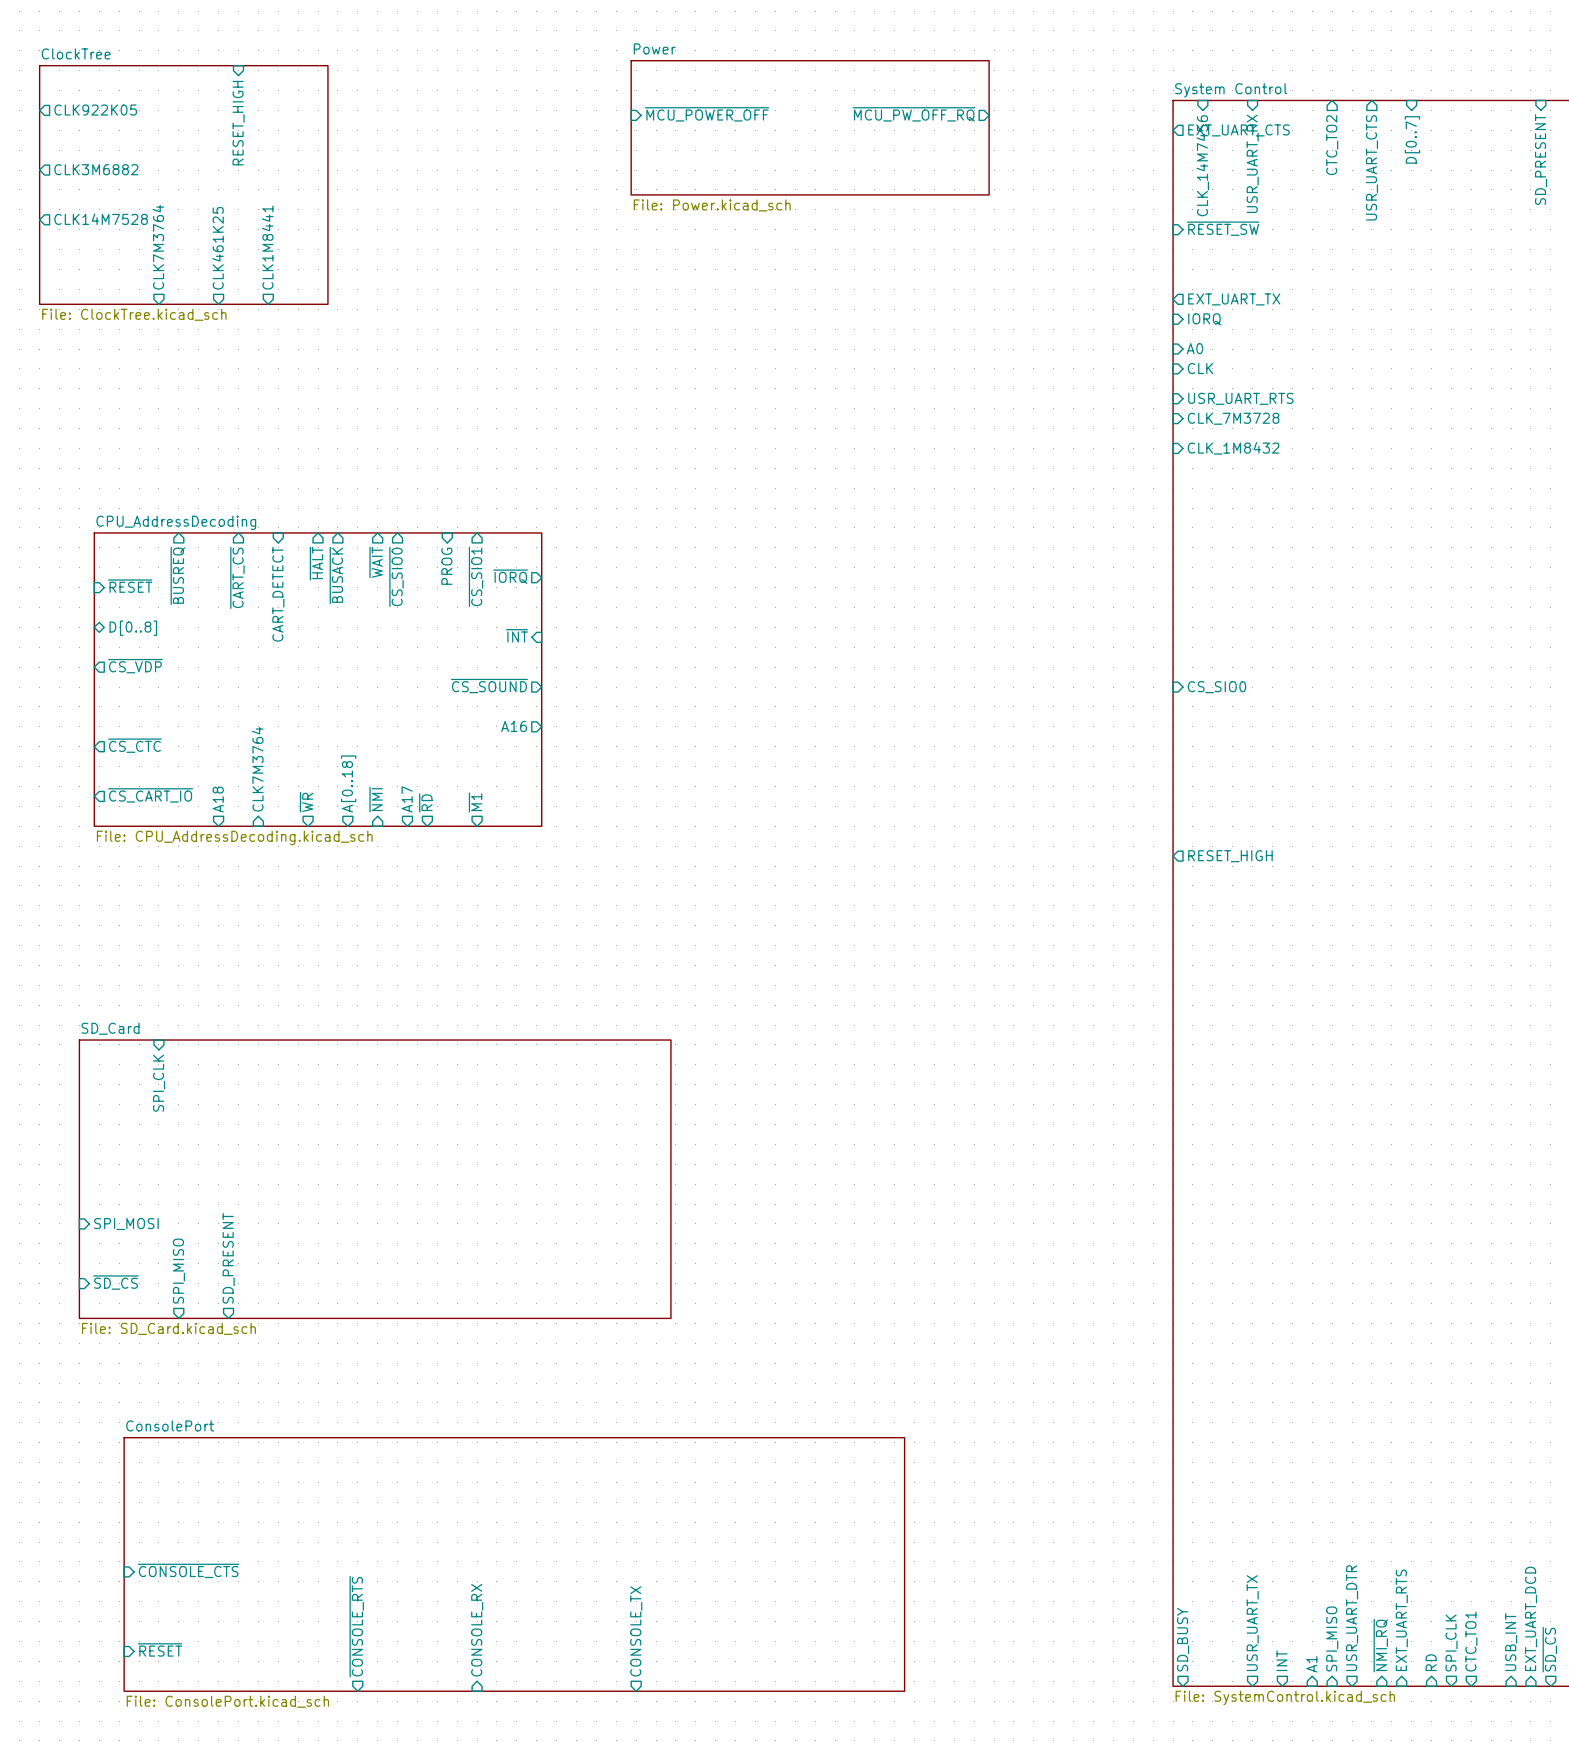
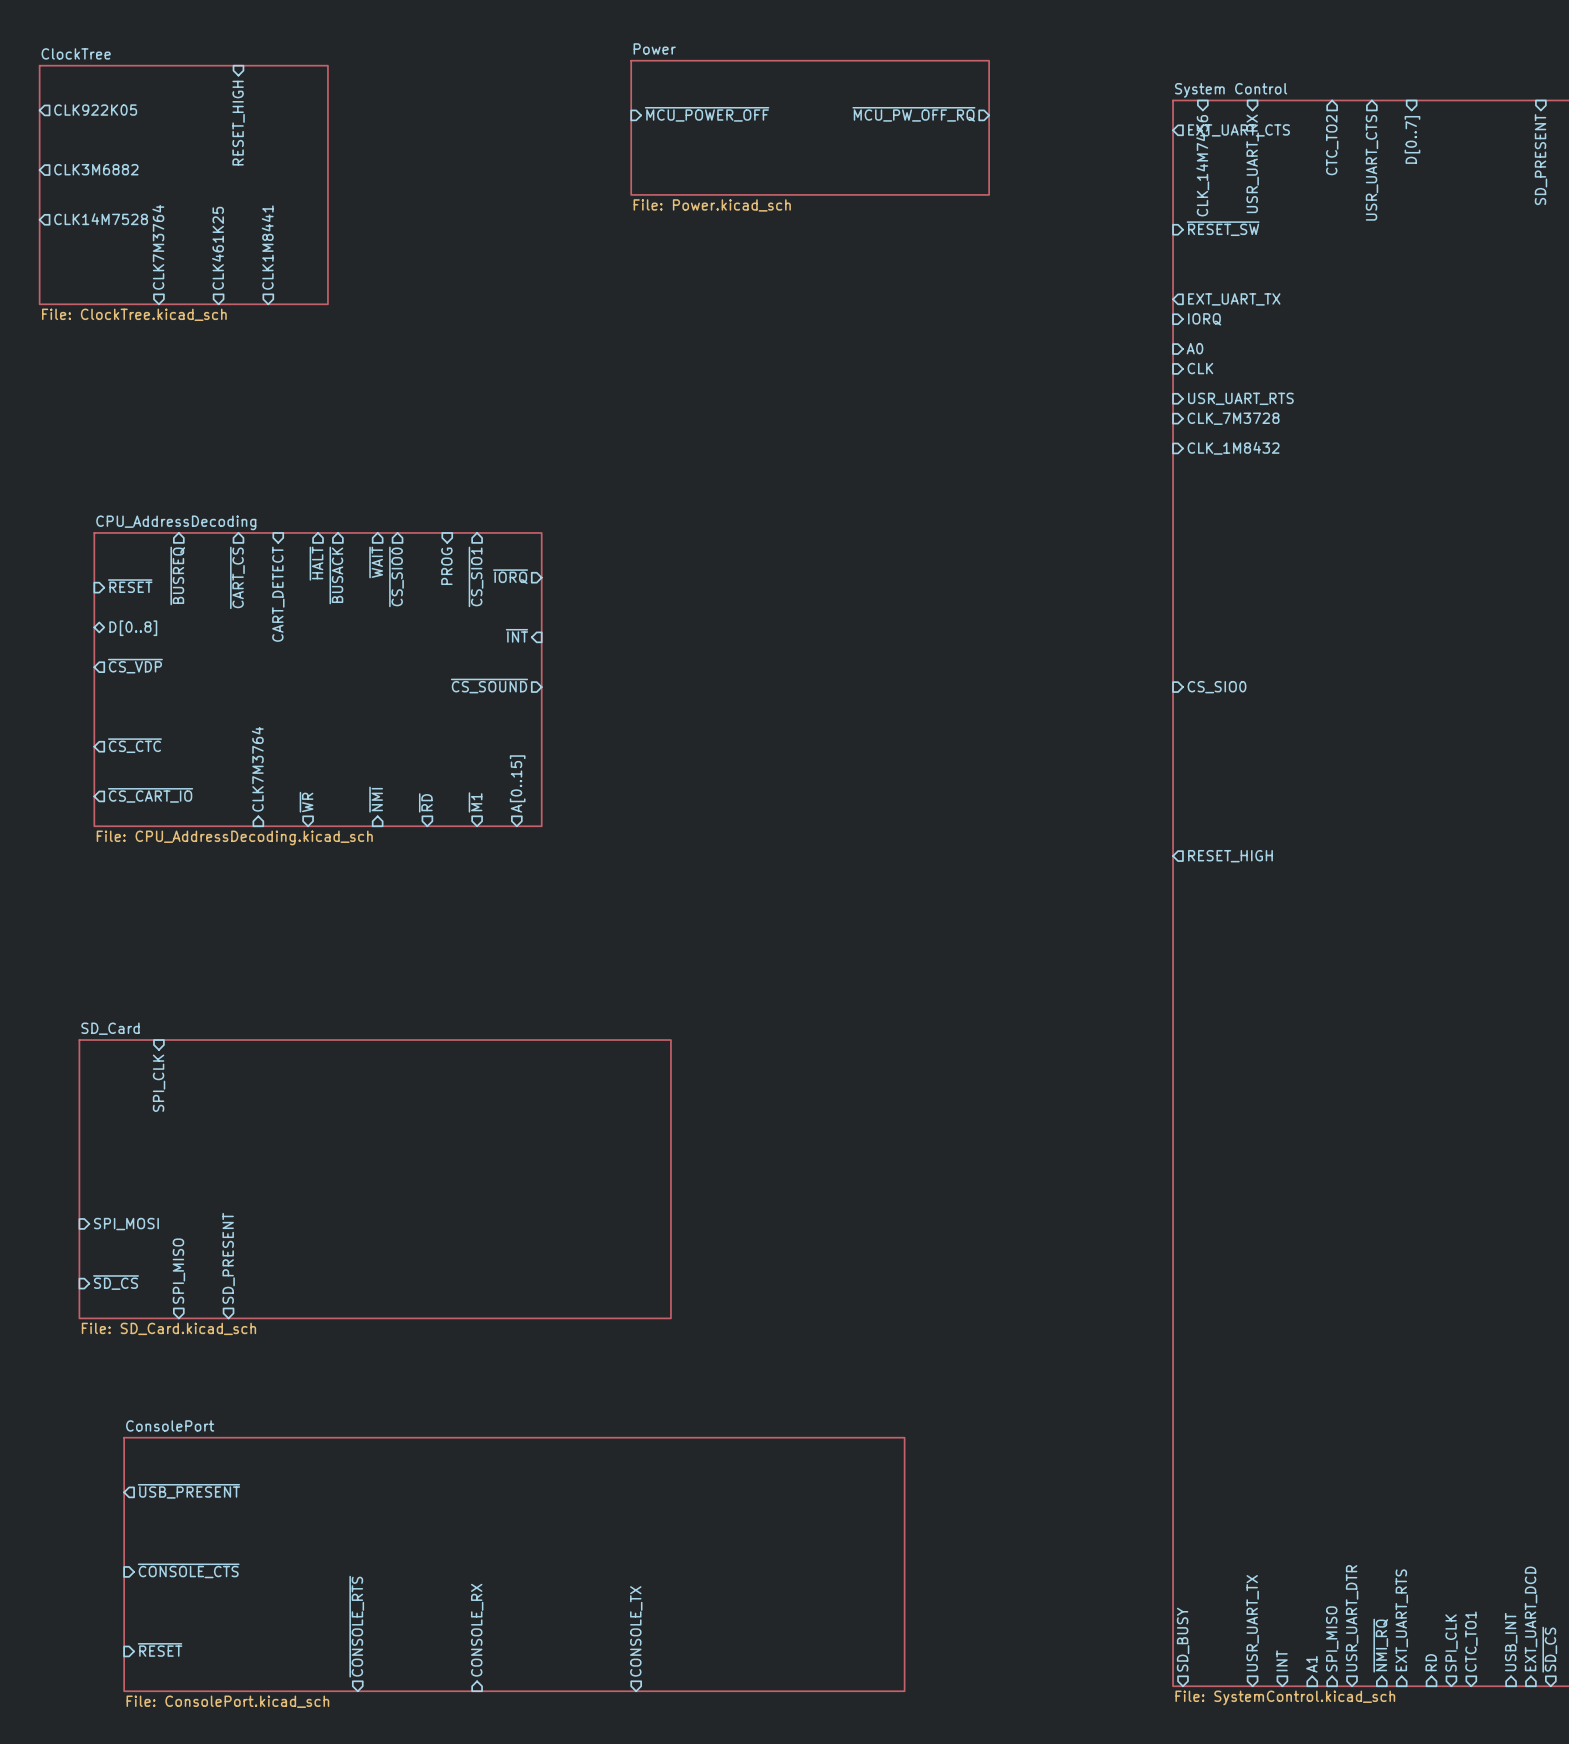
sheet pin: A16 (514, 726) -> none
sheet pin: A[0..18] (348, 783) -> none
sheet pin: none -> A[0..15] (517, 783)
sheet pin: A18 (218, 799) -> none
sheet pin: A17 (407, 799) -> none
sheet pin: none -> ~{USB_PRESENT} (188, 1491)

